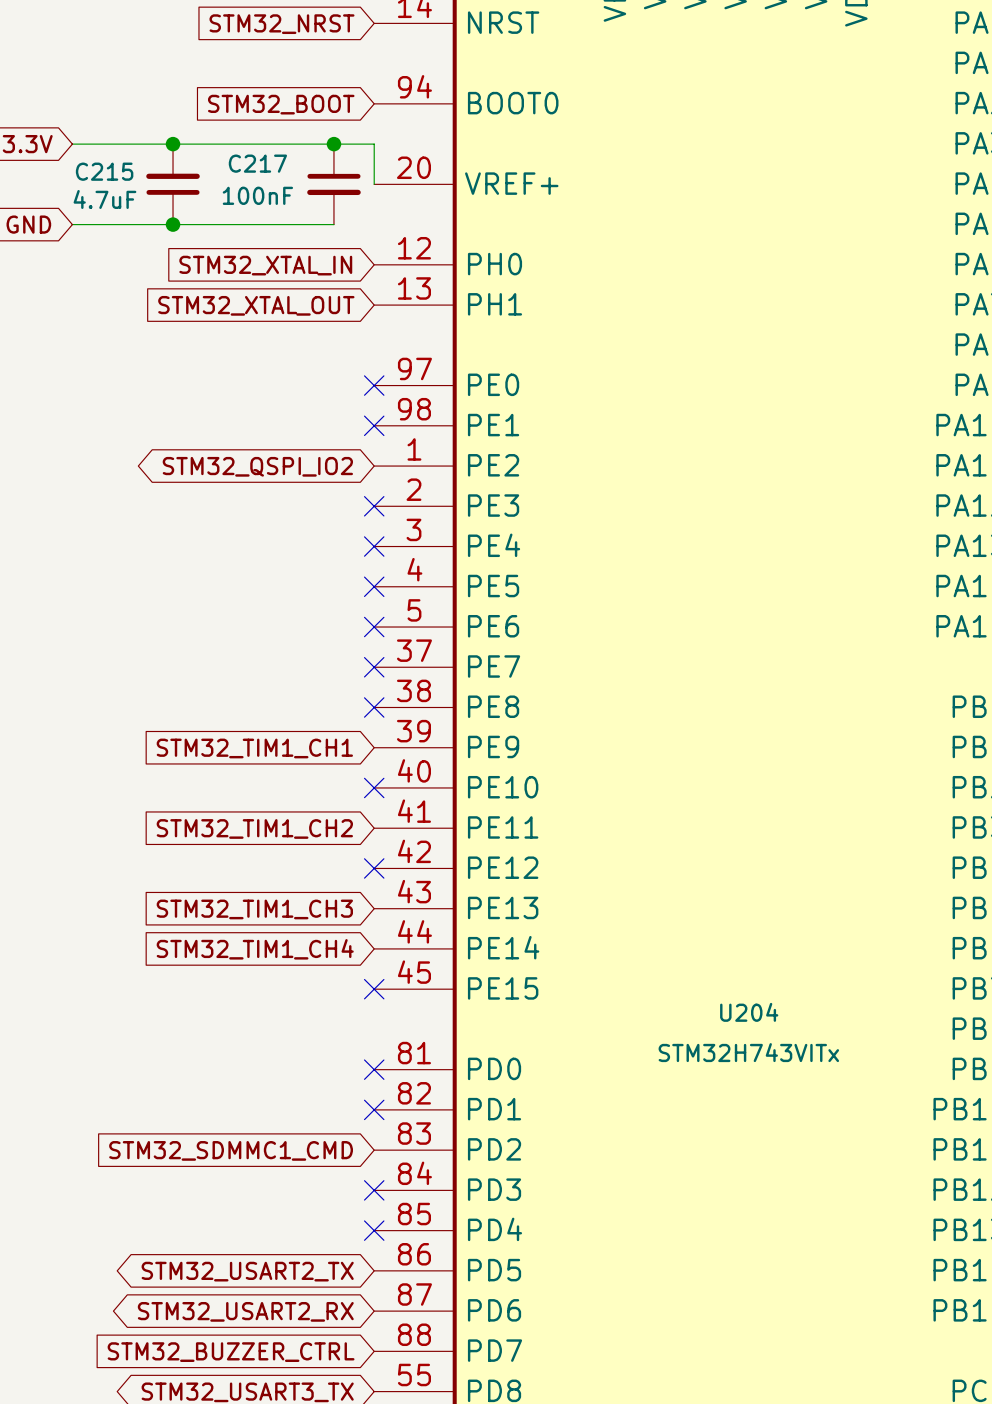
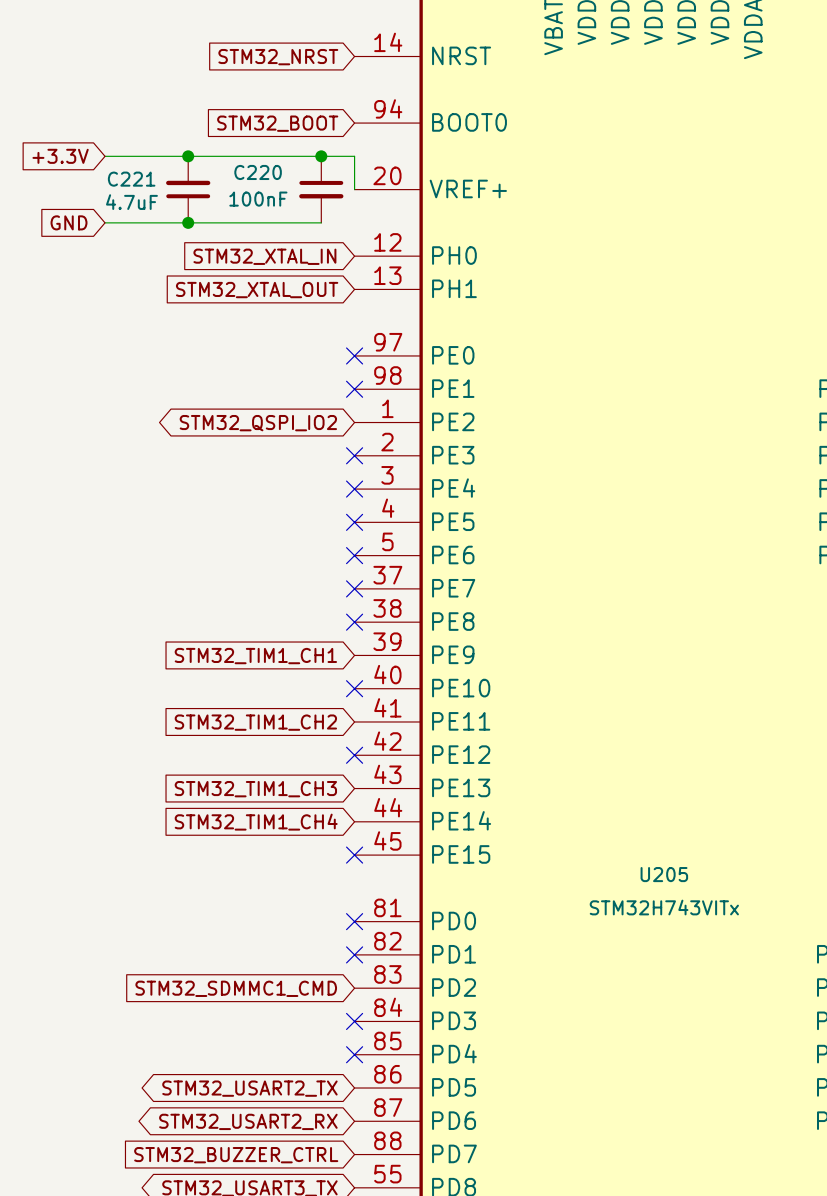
C217 name: C217 (257, 163) -> C220 (258, 172)
C215 name: C215 (104, 171) -> C221 (131, 179)
U204 name: U204 (749, 1012) -> U205 (664, 874)

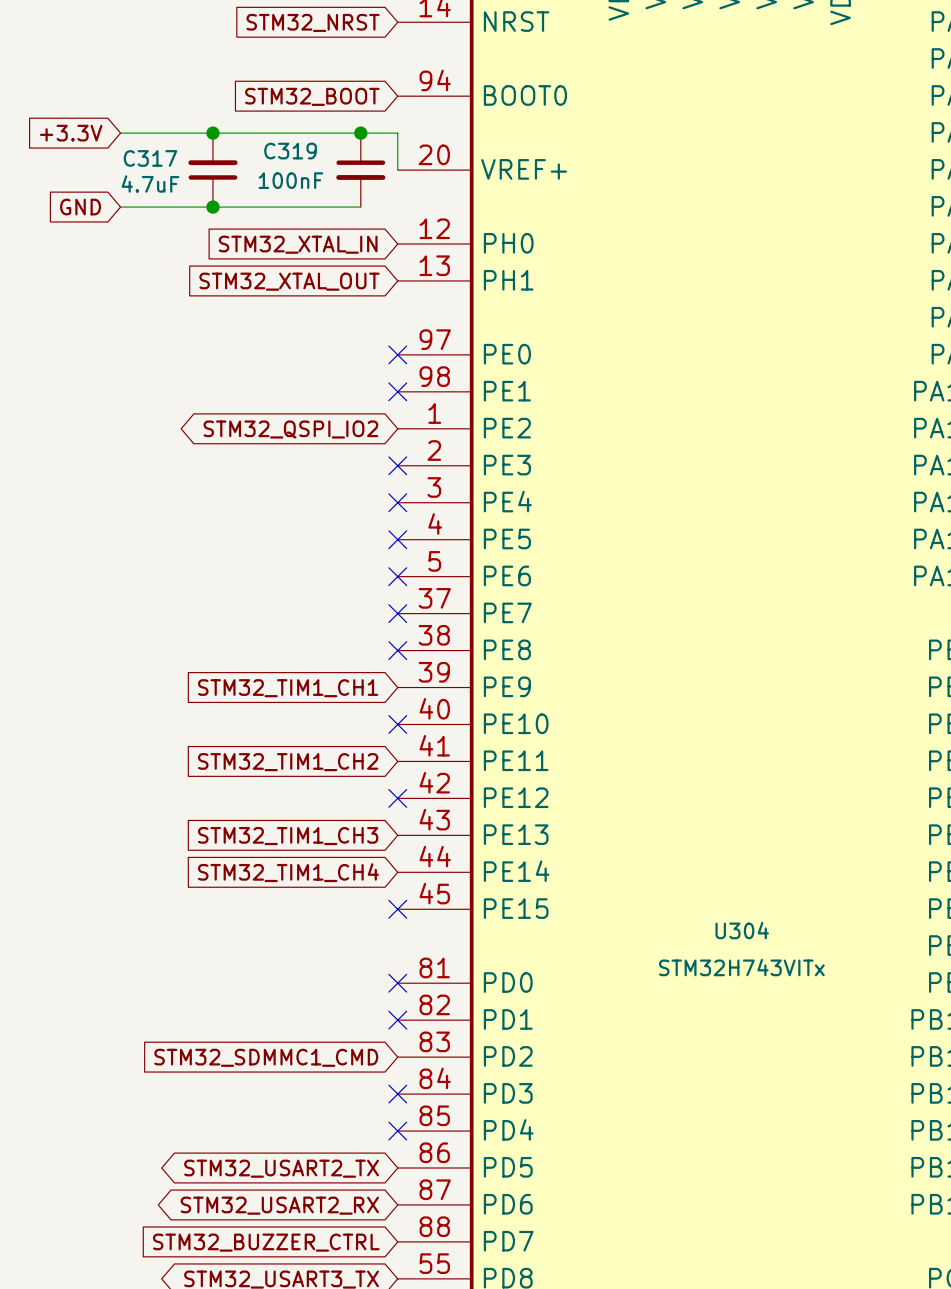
C220 name: C220 (258, 172) -> C319 (290, 151)
C221 name: C221 (131, 179) -> C317 (150, 158)
U205 name: U205 (664, 874) -> U304 (742, 930)

